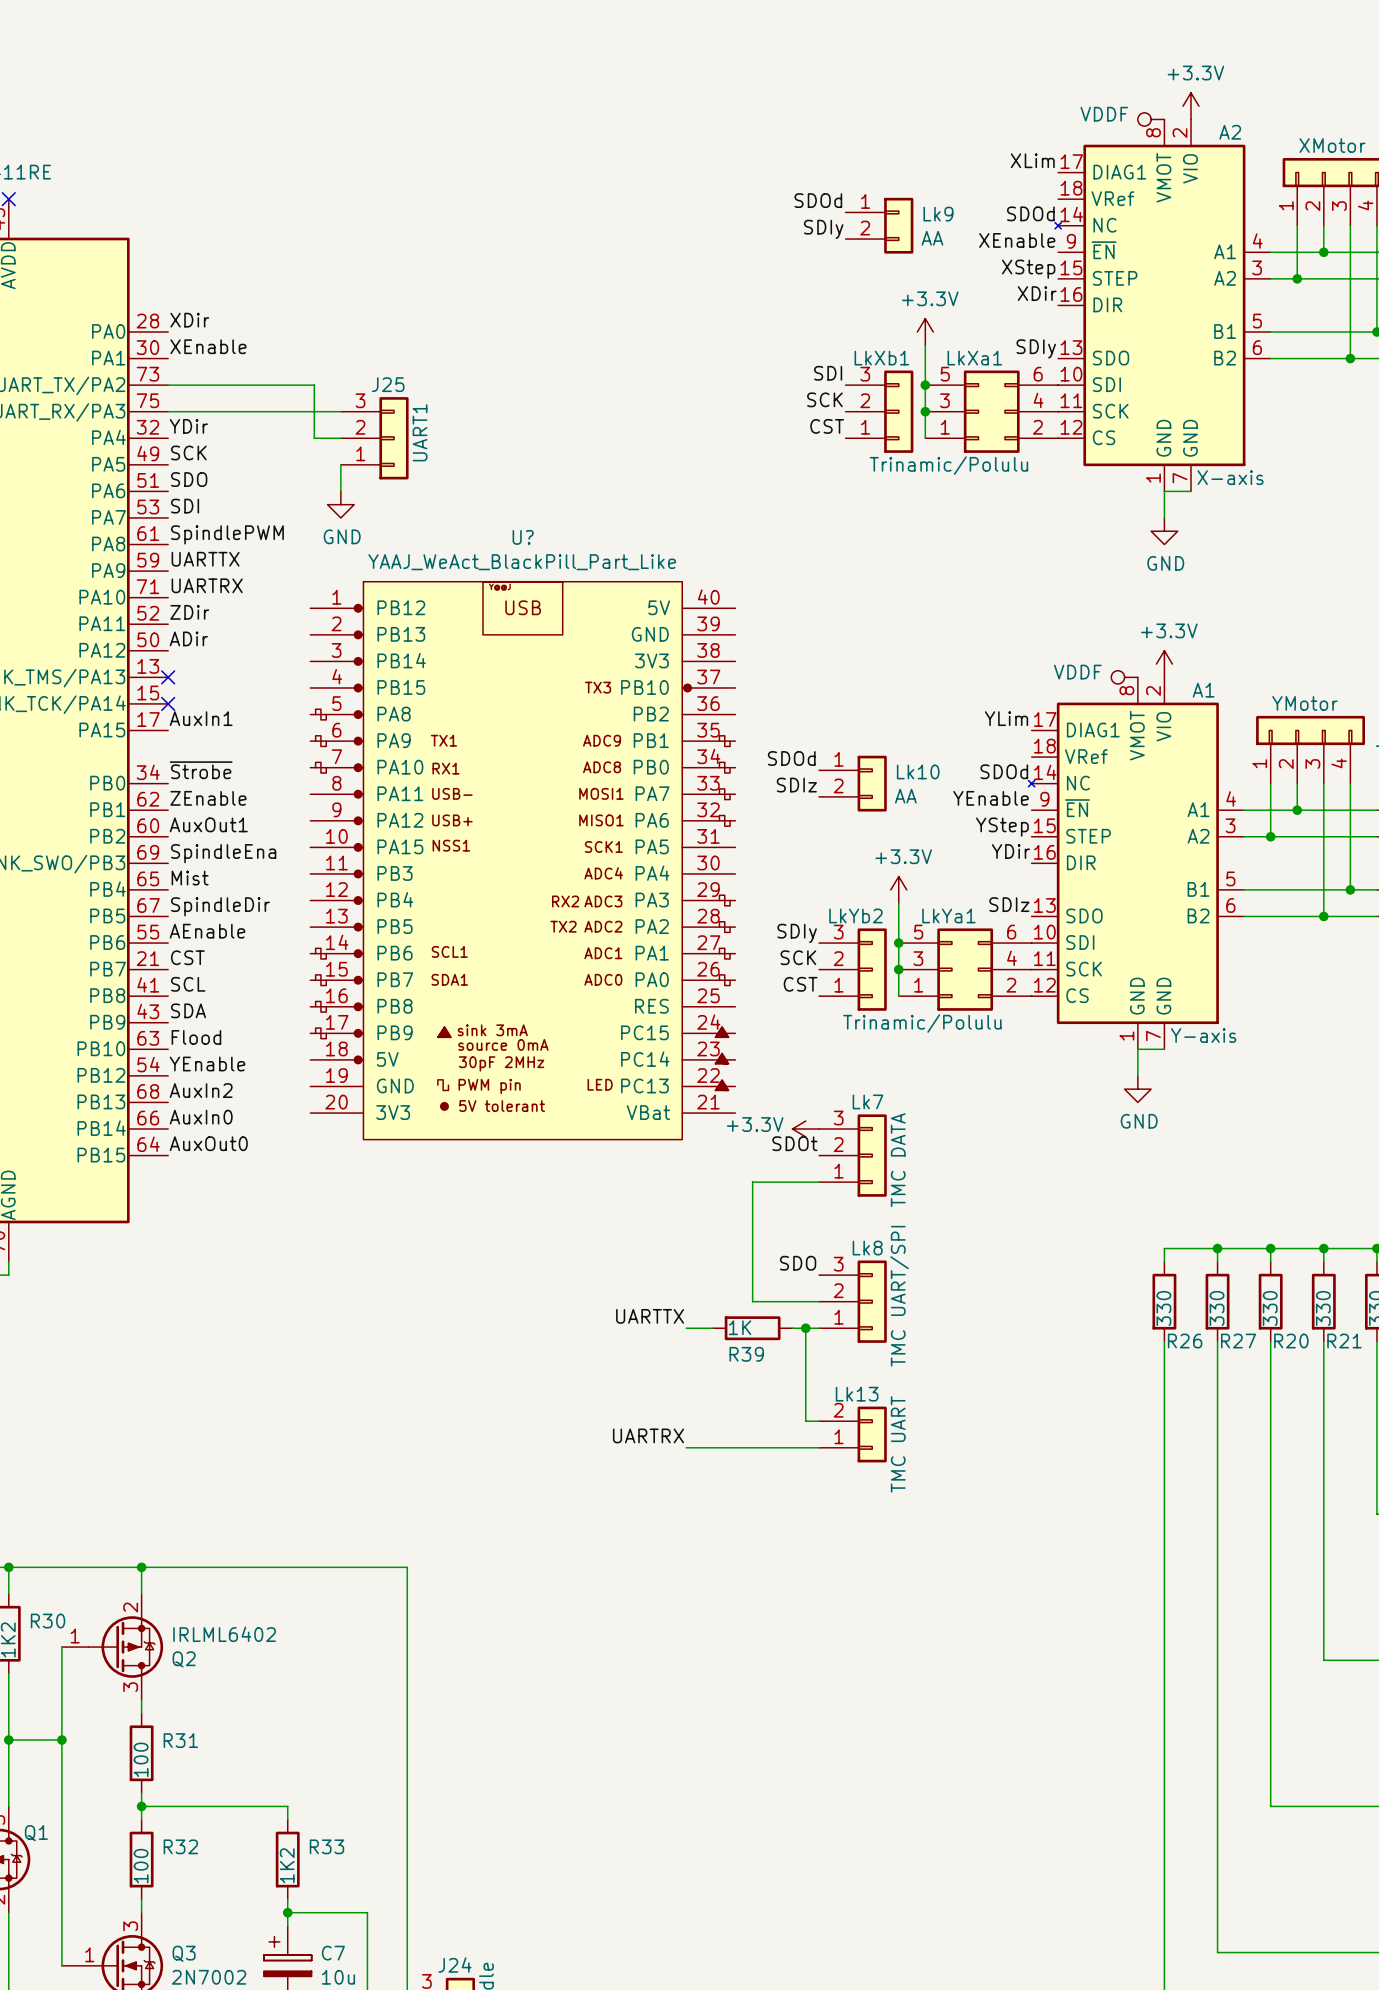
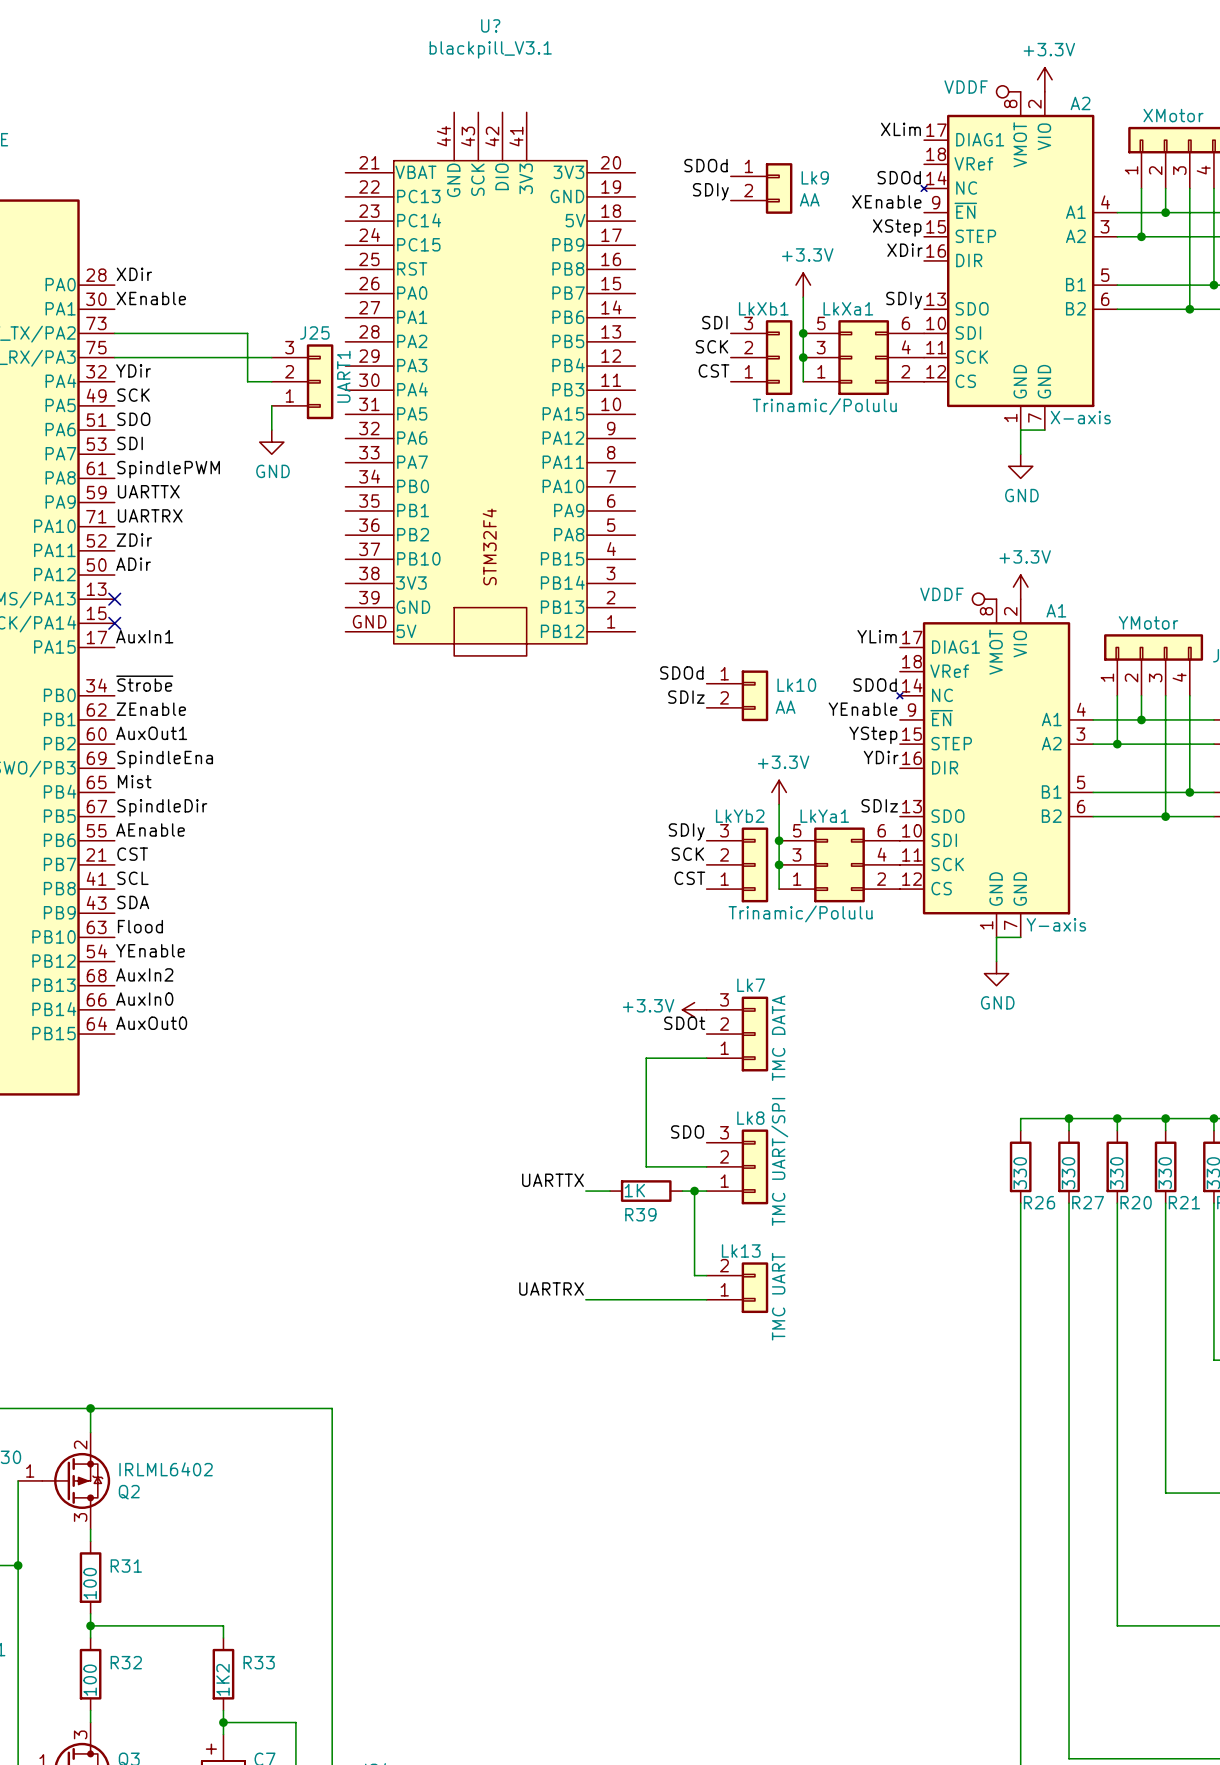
U?: none -> blackpill_V3.1 (490, 384)
U?: YAAJ_WeAct_BlackPill_Part_Like (522, 860) -> none

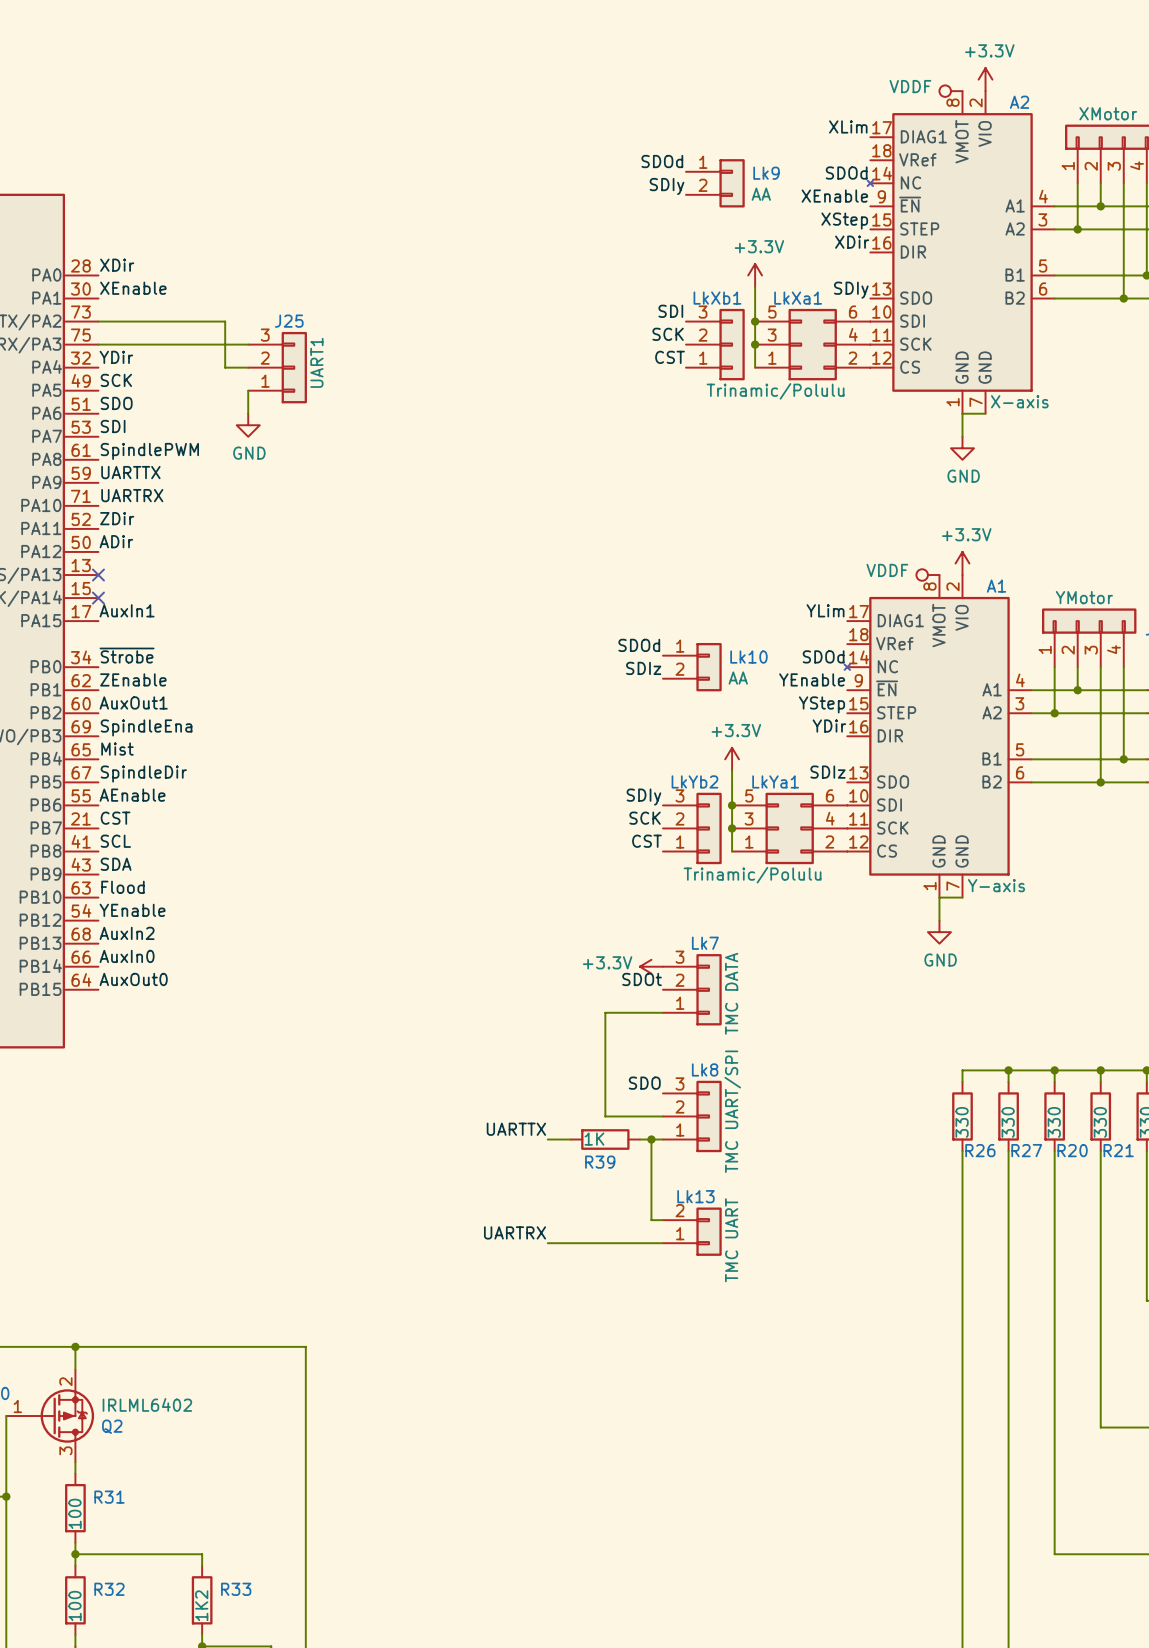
U?: blackpill_V3.1 (490, 384) -> none

